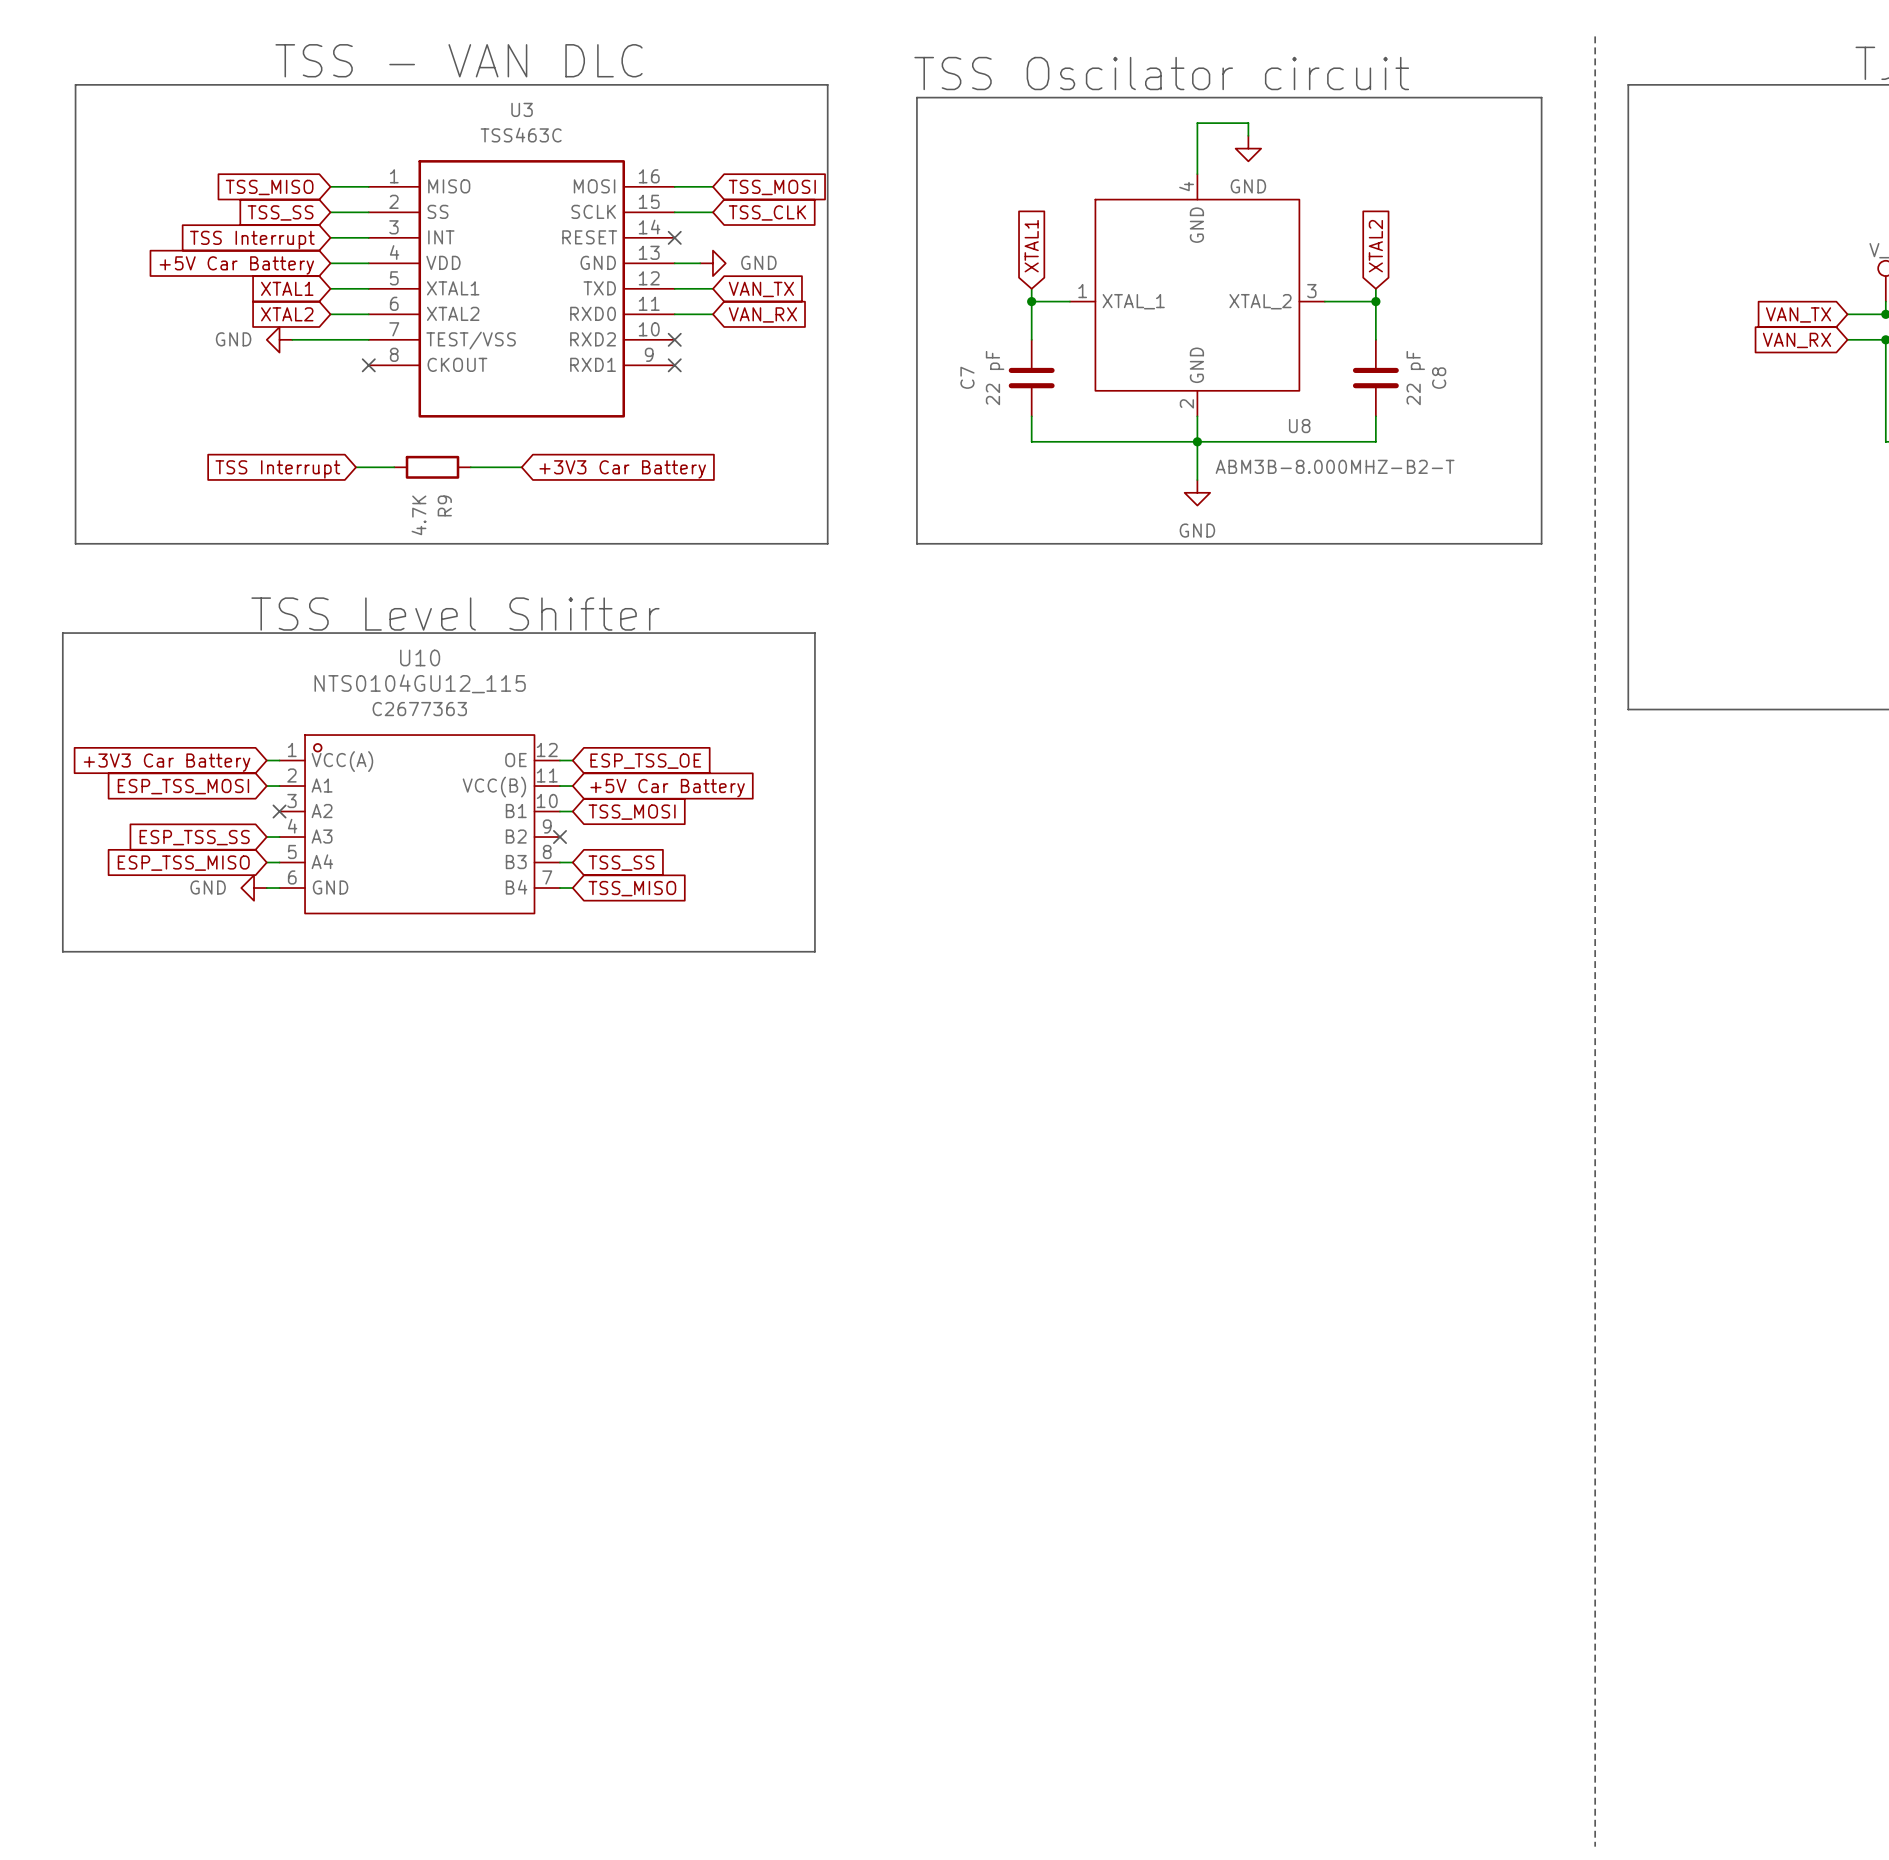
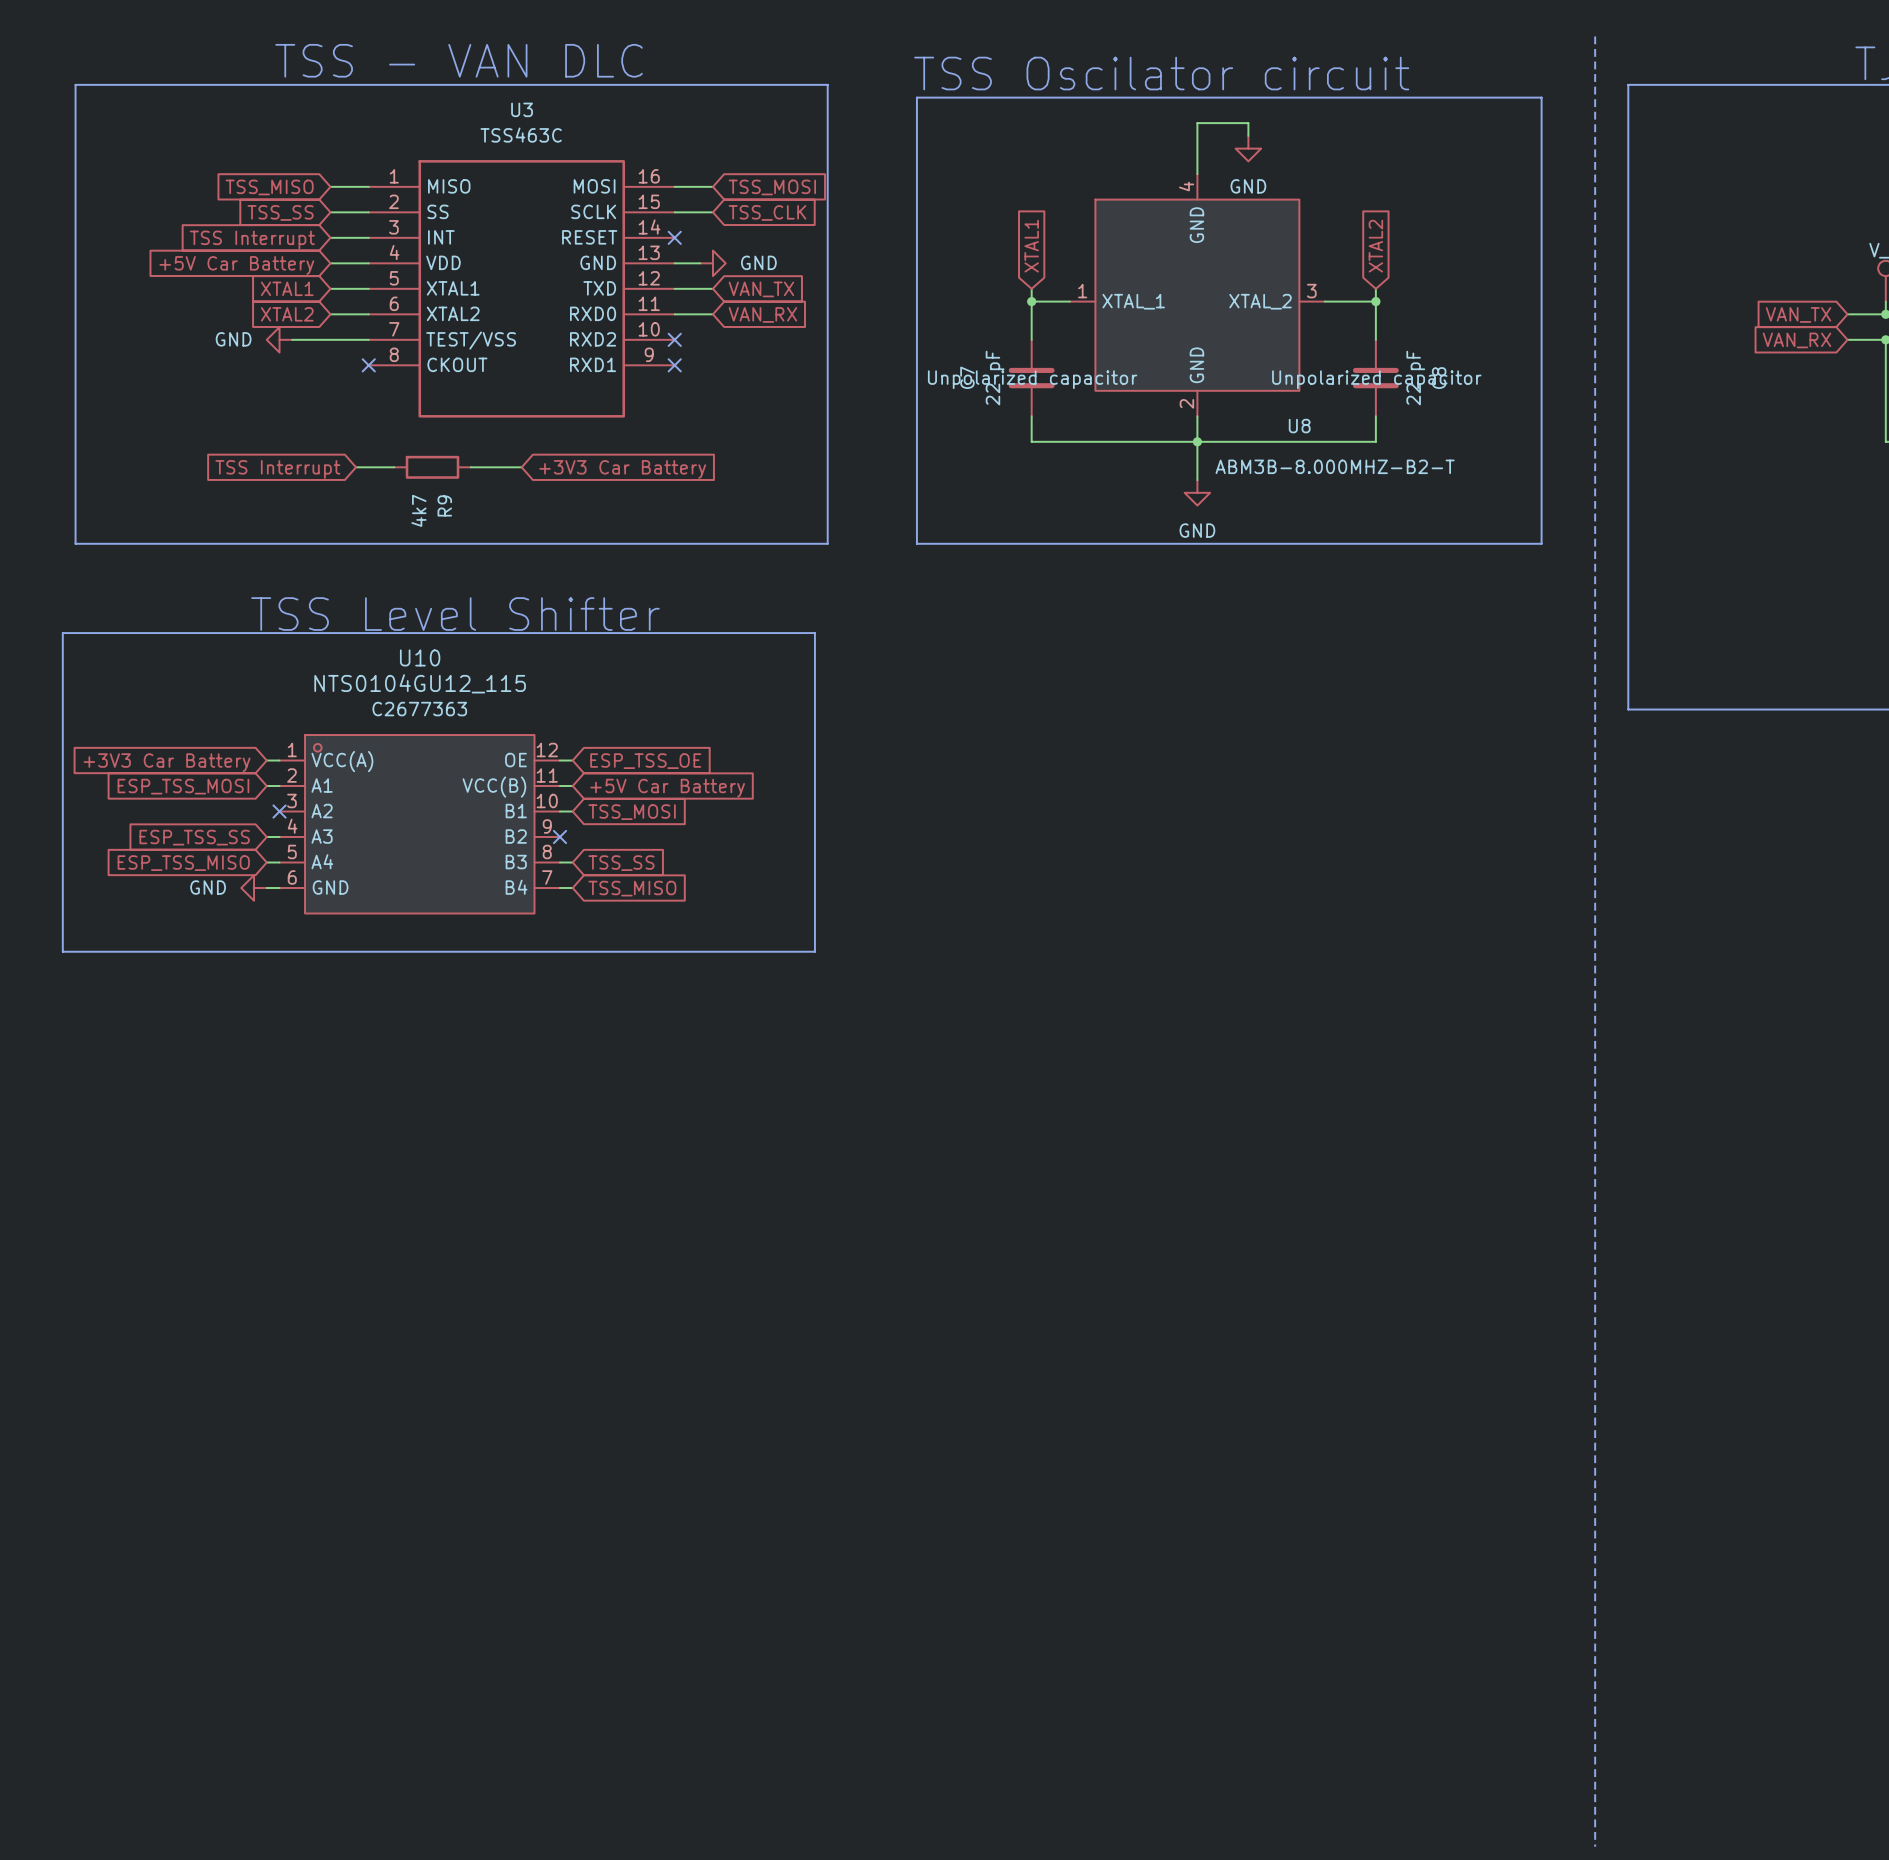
C7 text: none -> Unpolarized capacitor (1032, 379)
C8 text: none -> Unpolarized capacitor (1376, 379)
R9 value: 4.7K (418, 515) -> 4k7 (418, 510)

